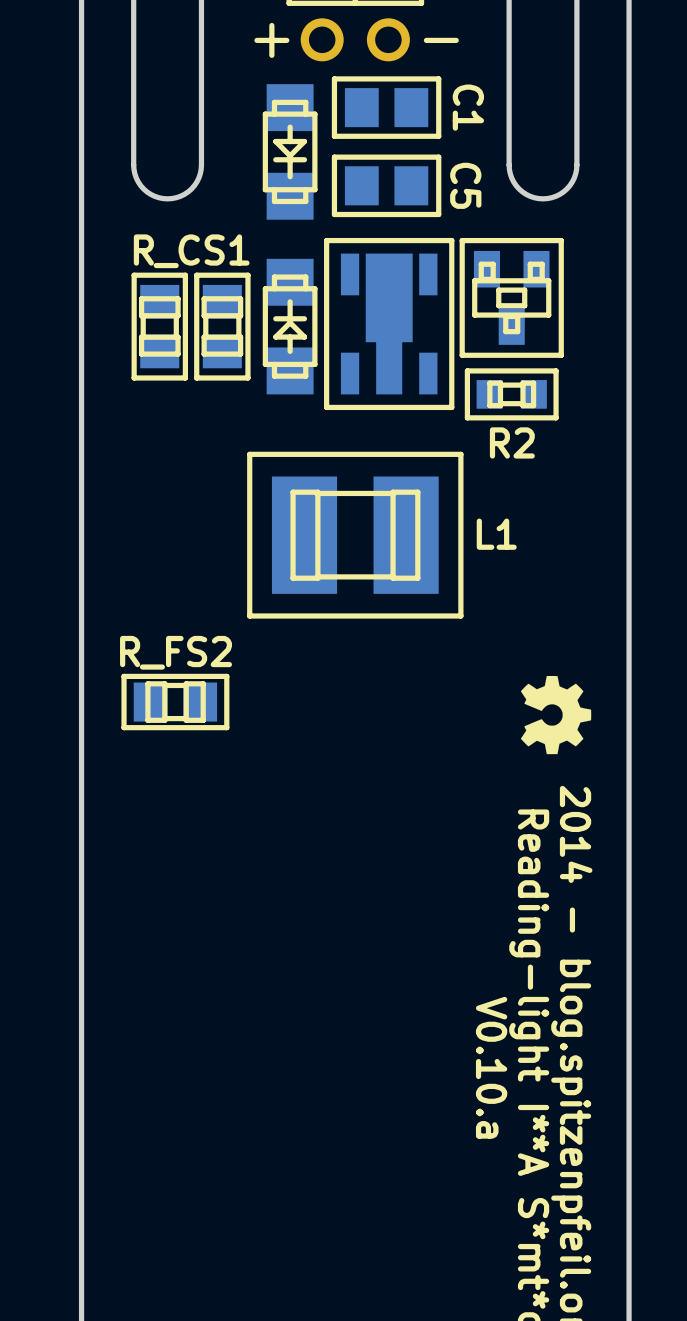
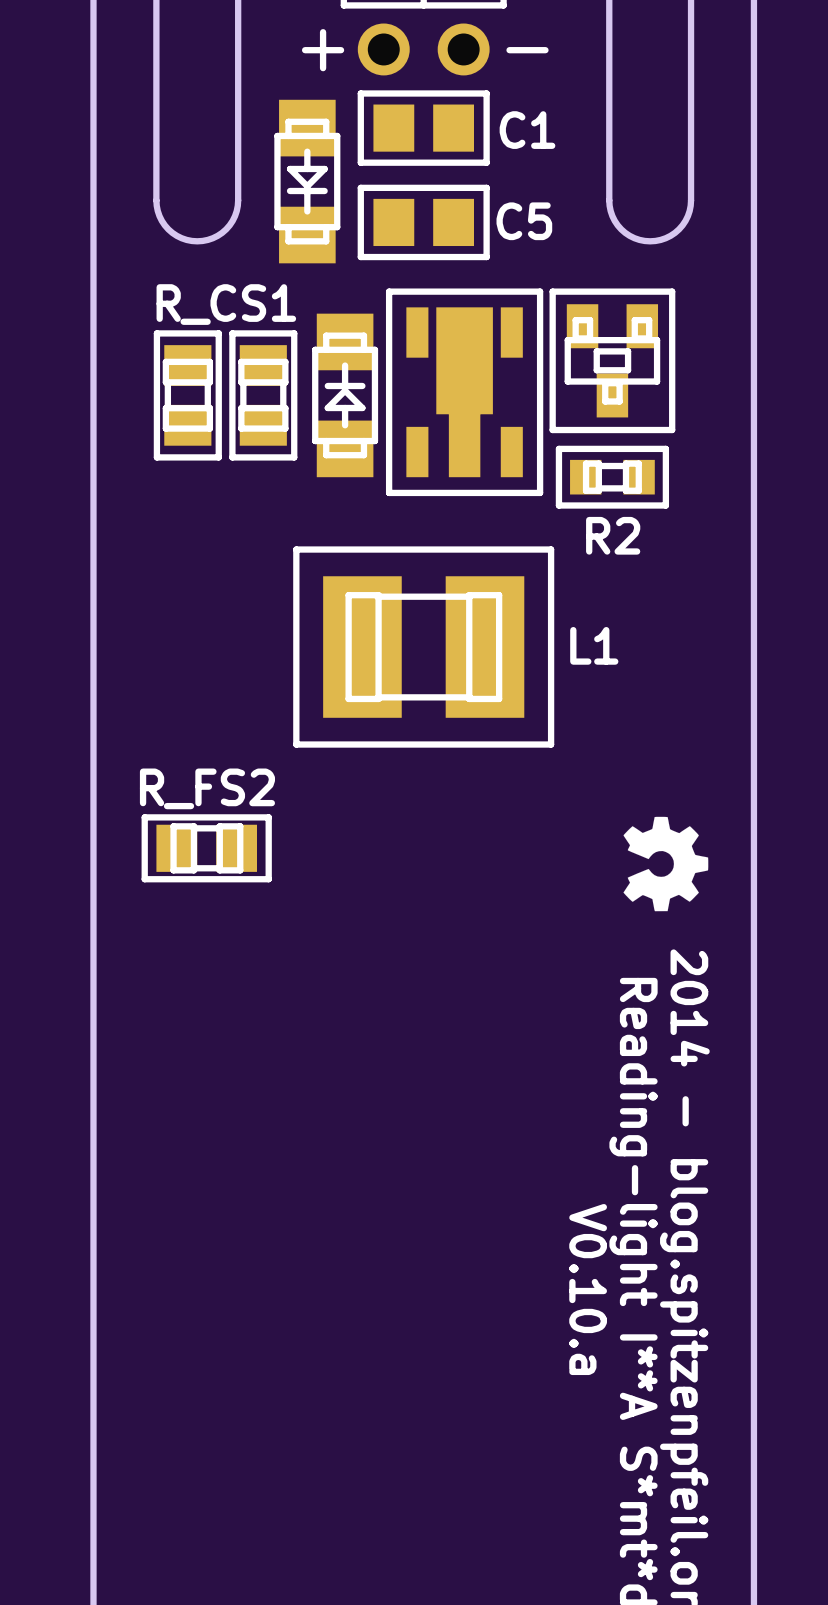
C1 position: (386, 107) -> (423, 128)
C1 name rotation: 0° (468, 107) -> 90° counterclockwise (527, 130)
part position: (290, 151) -> (307, 181)
C5 position: (386, 185) -> (423, 222)
C5 name rotation: 0° (465, 185) -> 90° counterclockwise (524, 221)

